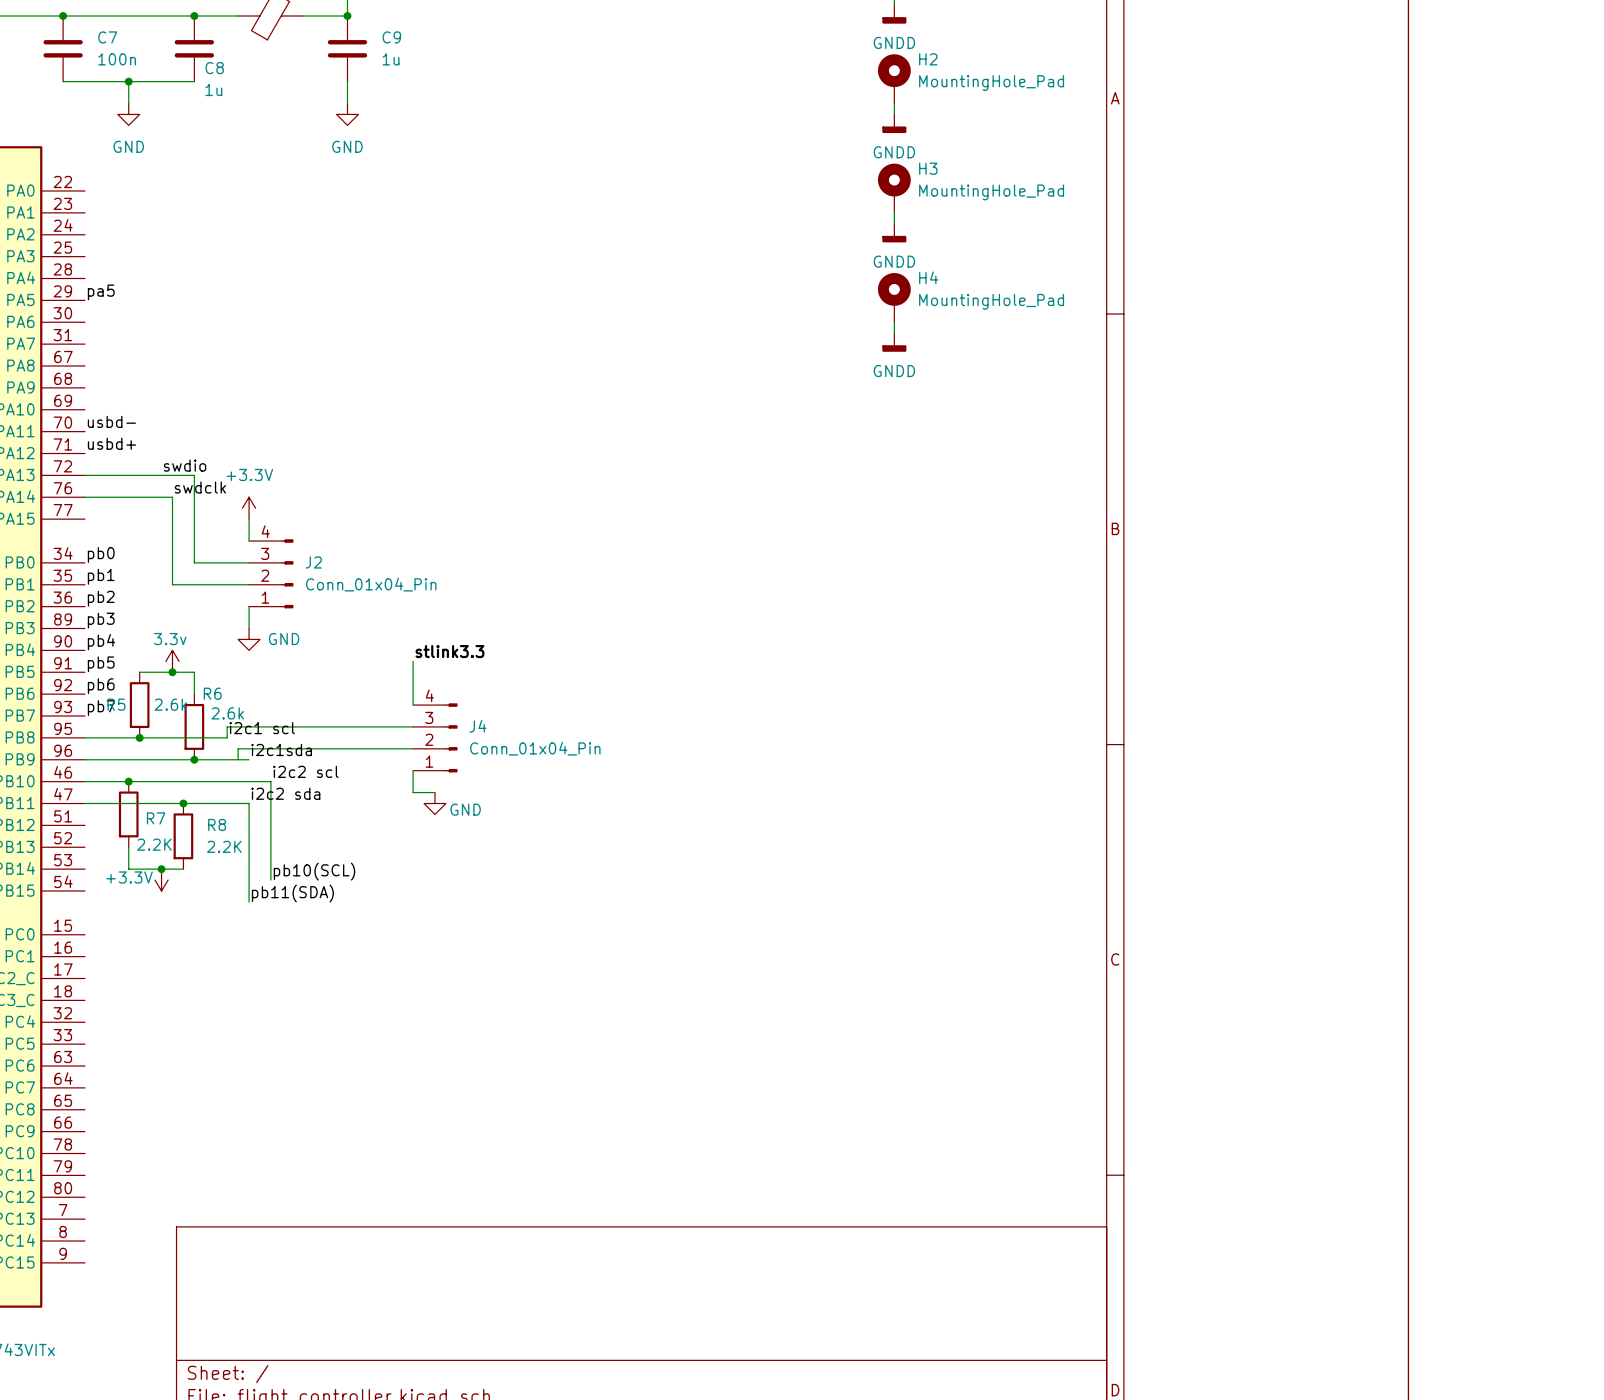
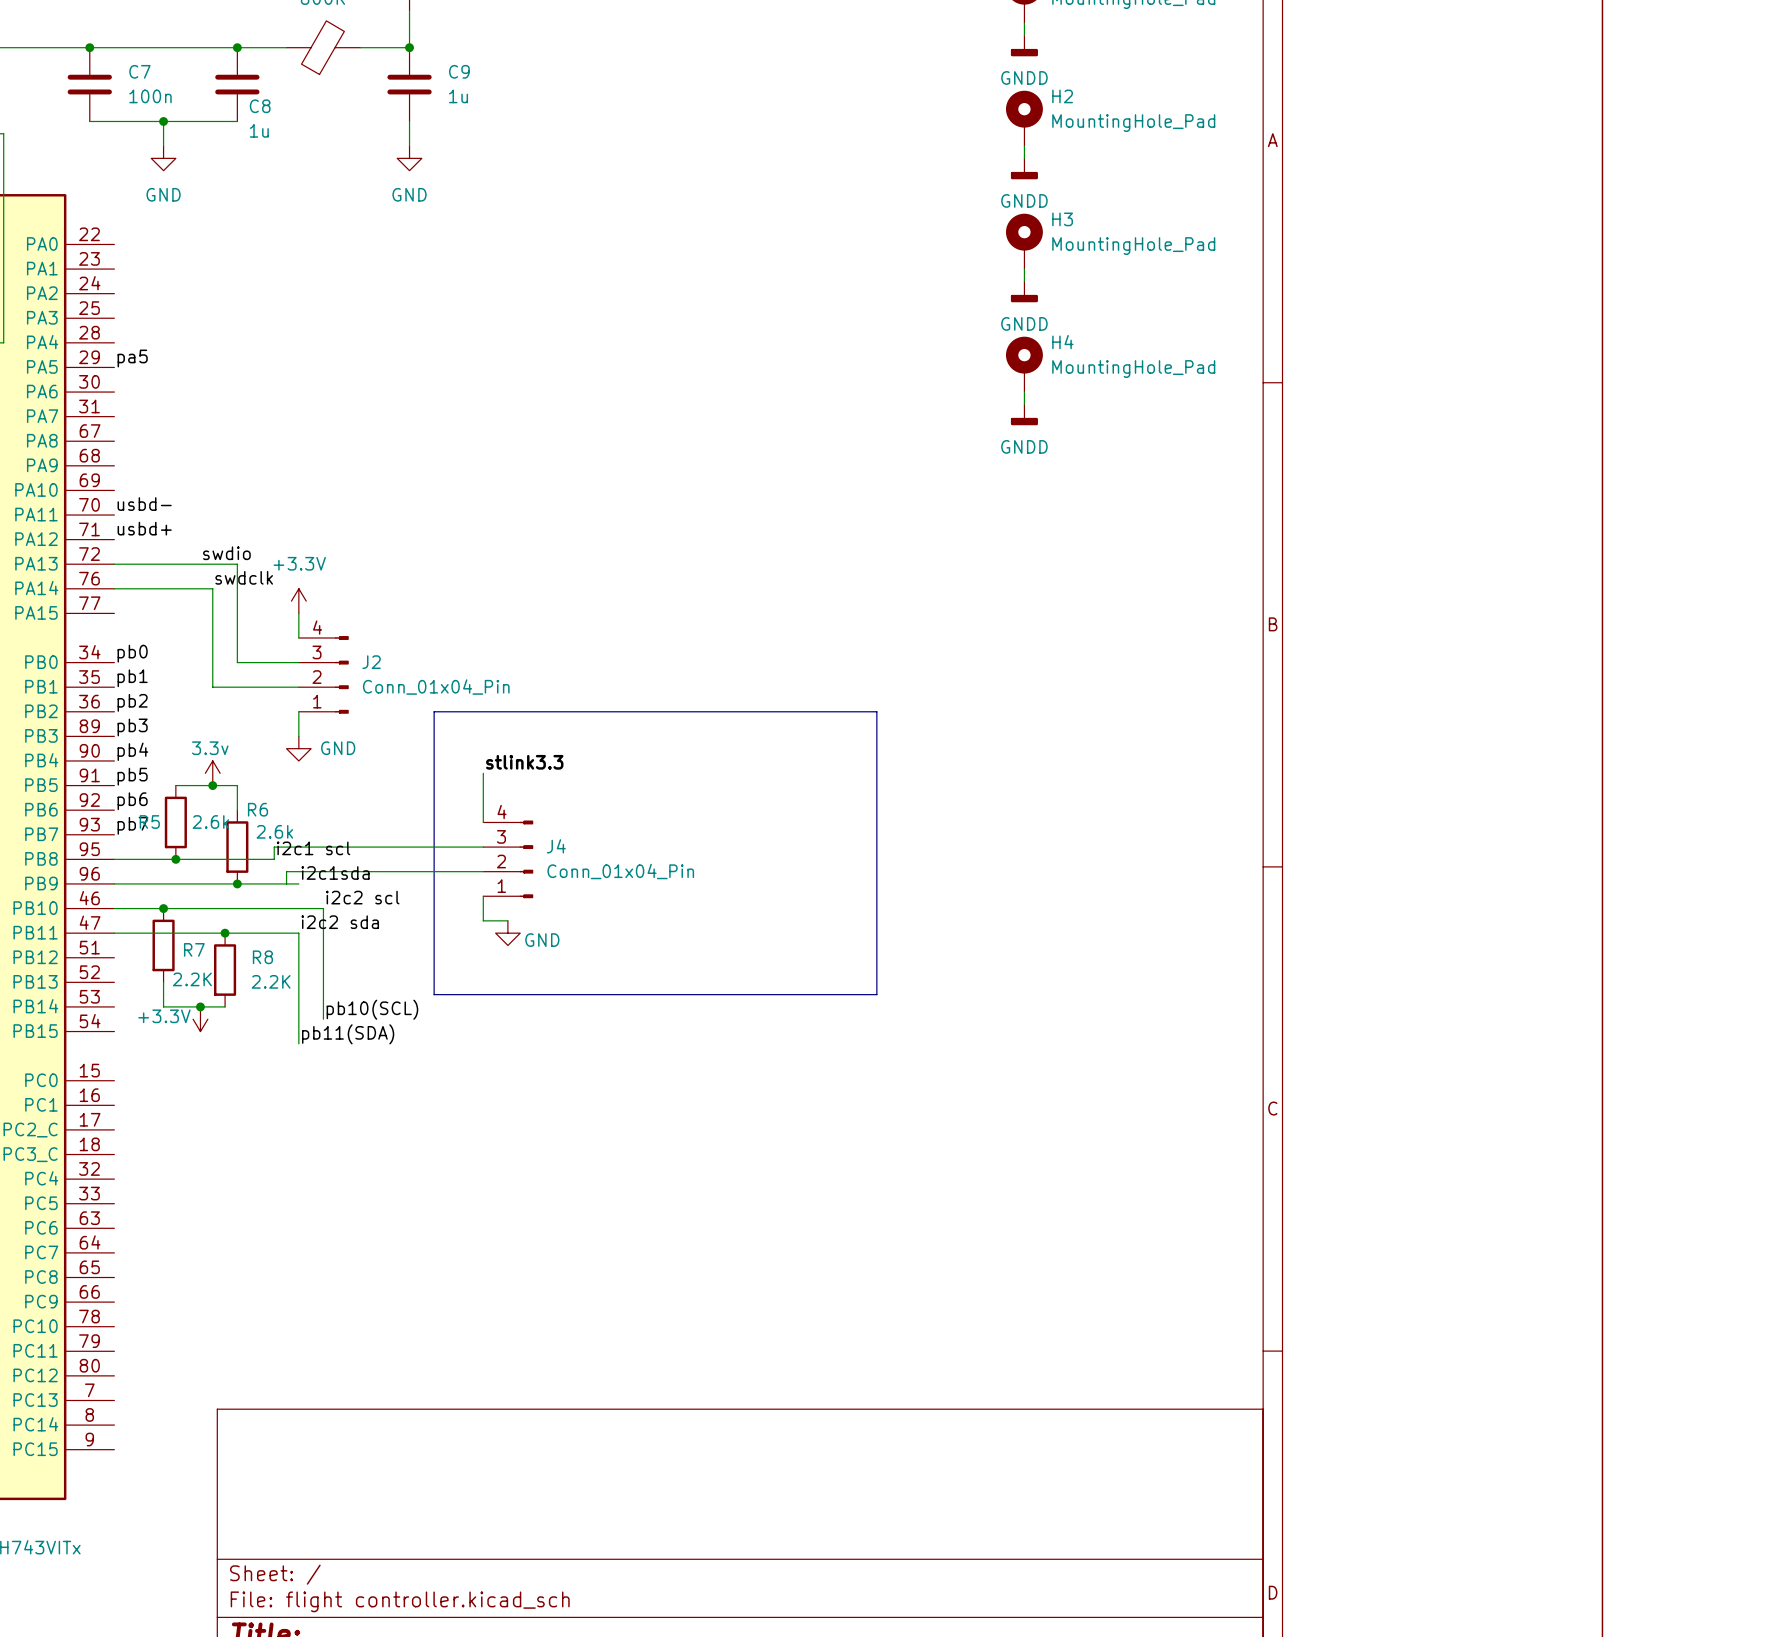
line: none -> (434, 711) (876, 711) (876, 994) (434, 994) (434, 711)

